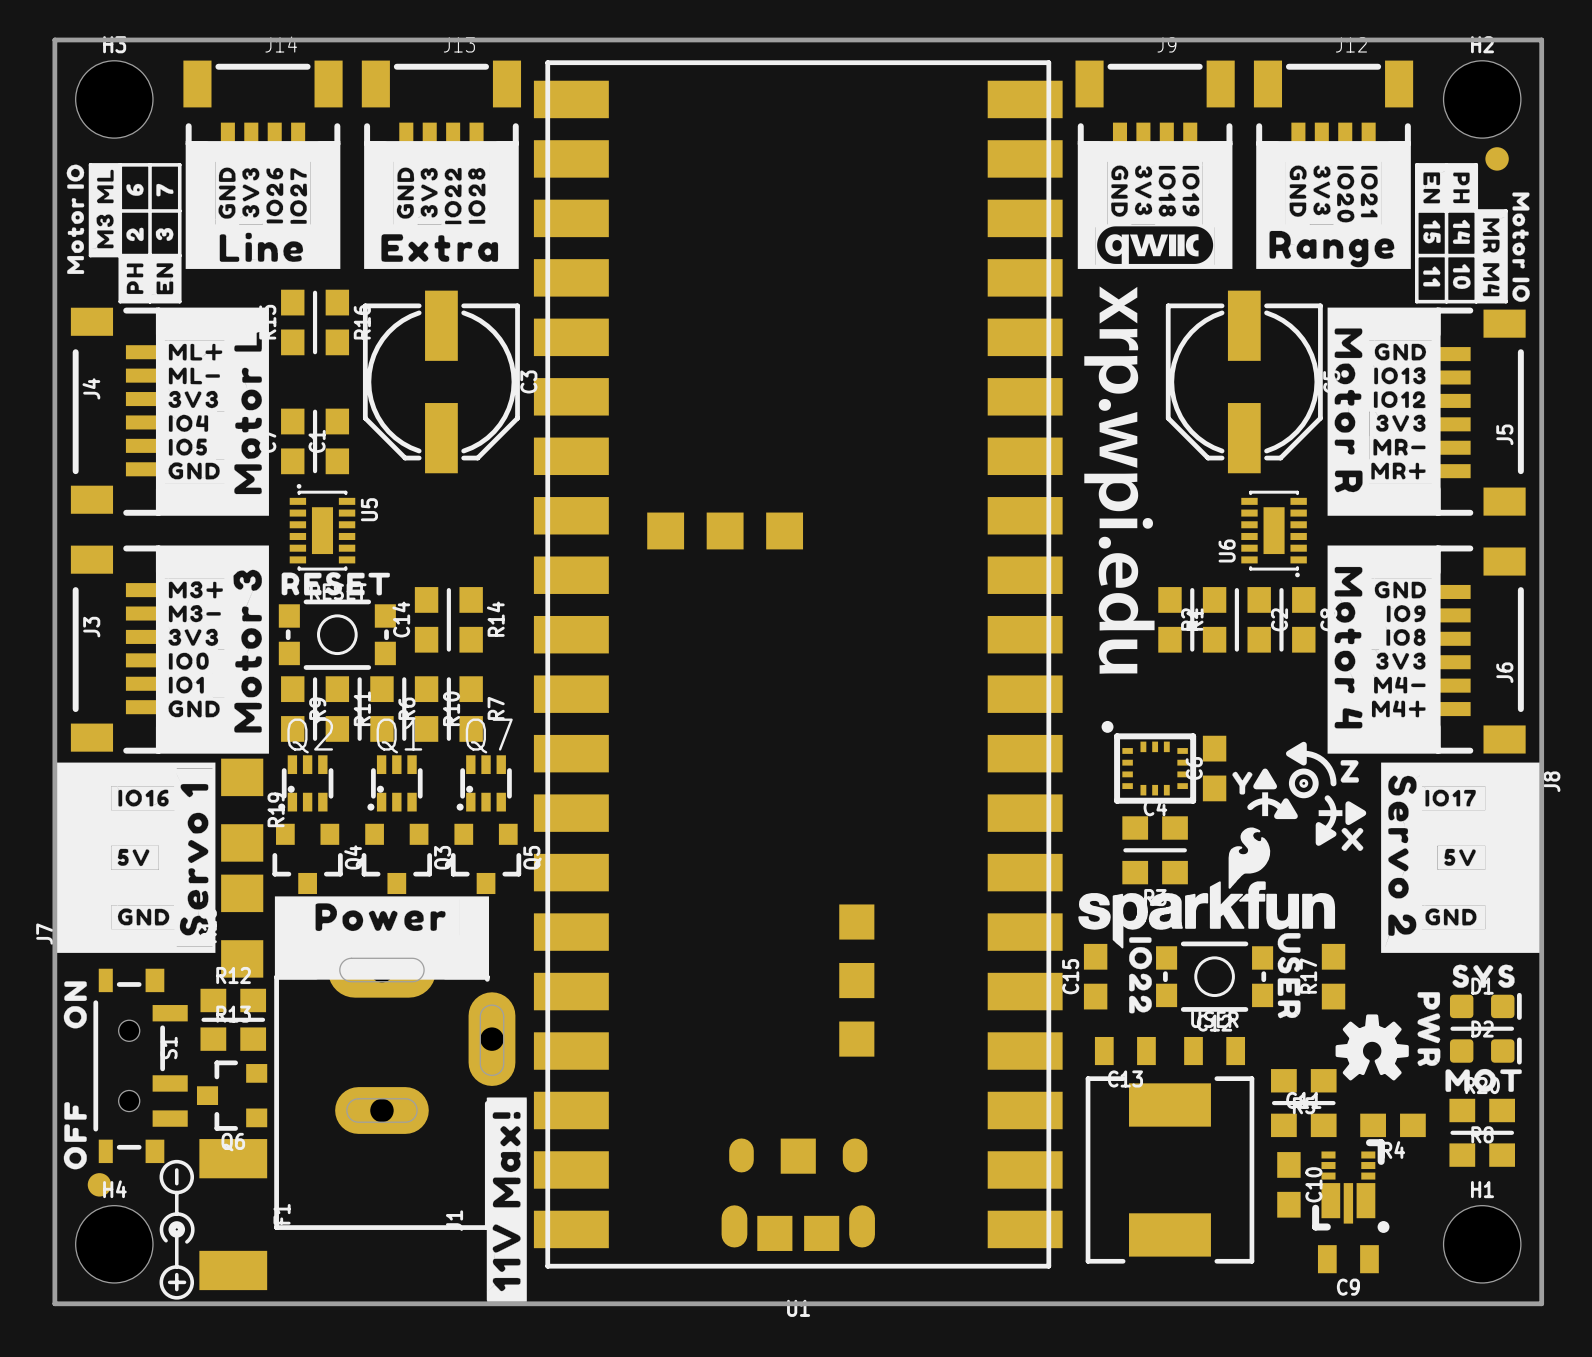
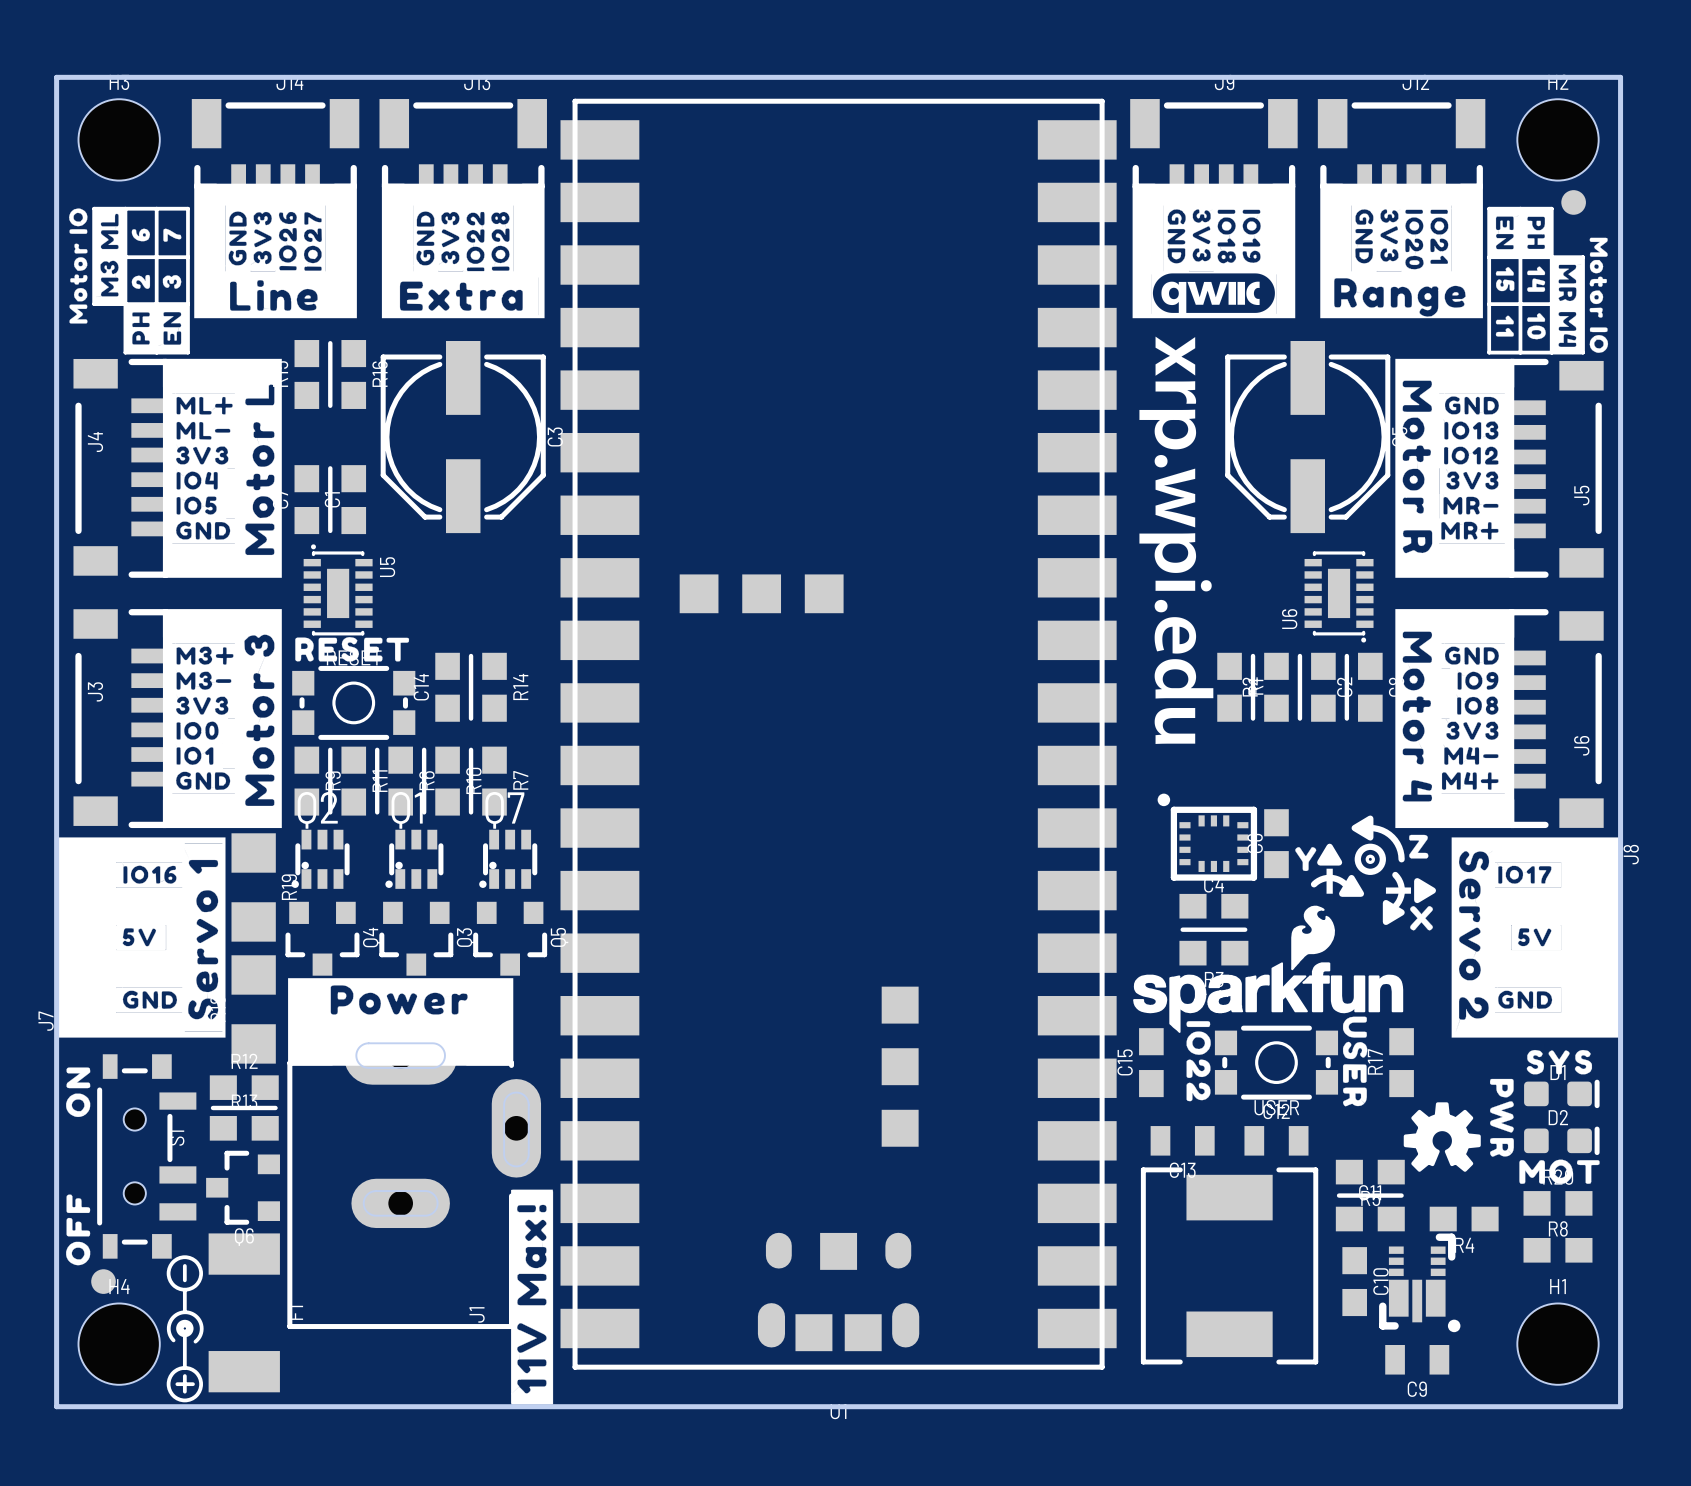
line: (1452, 1028) (1511, 1028) -> none
line: (1452, 1132) (1511, 1132) -> none

